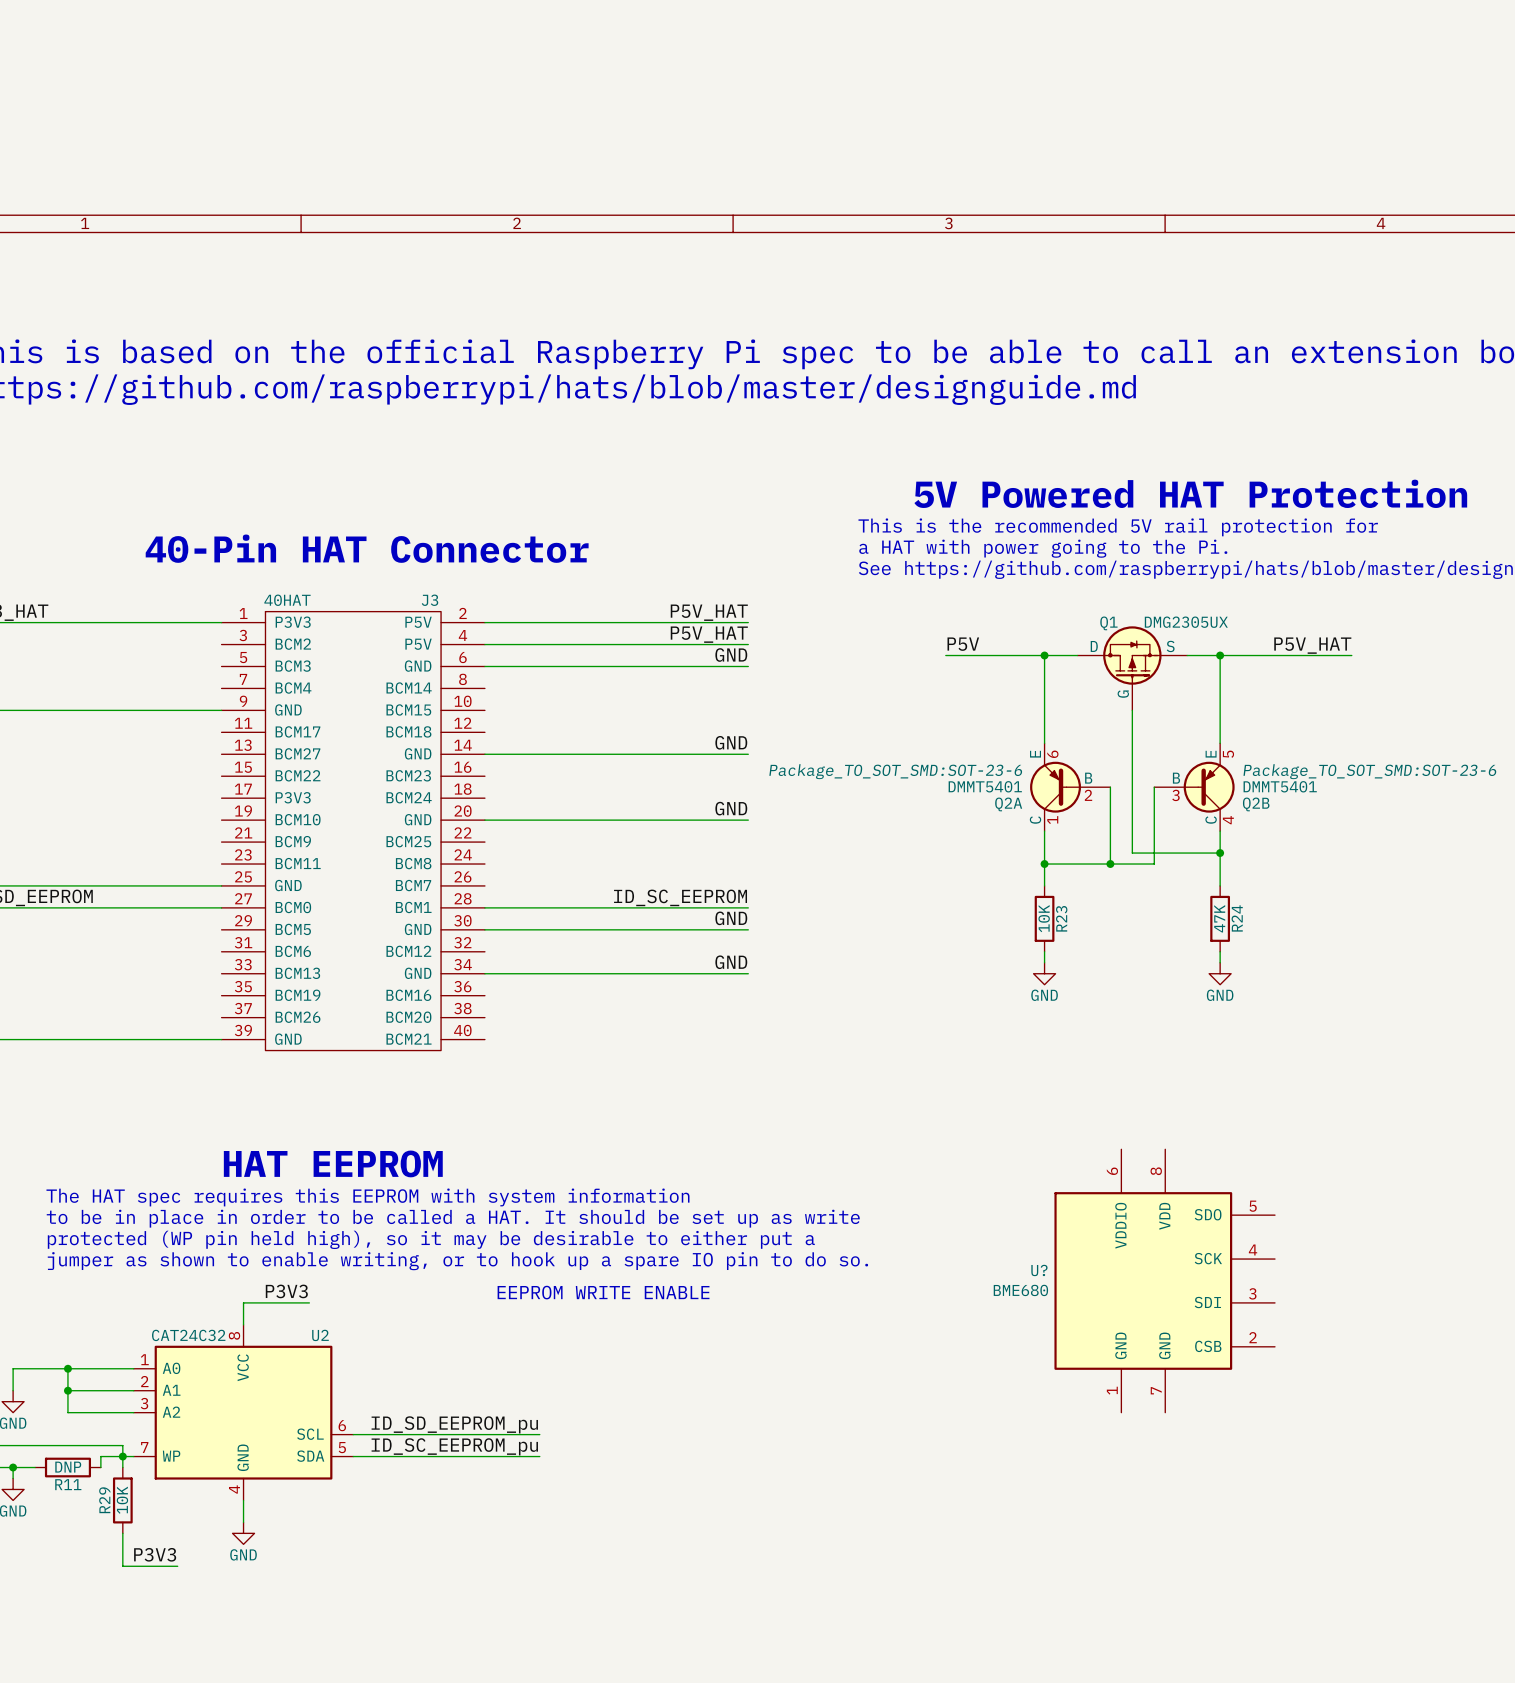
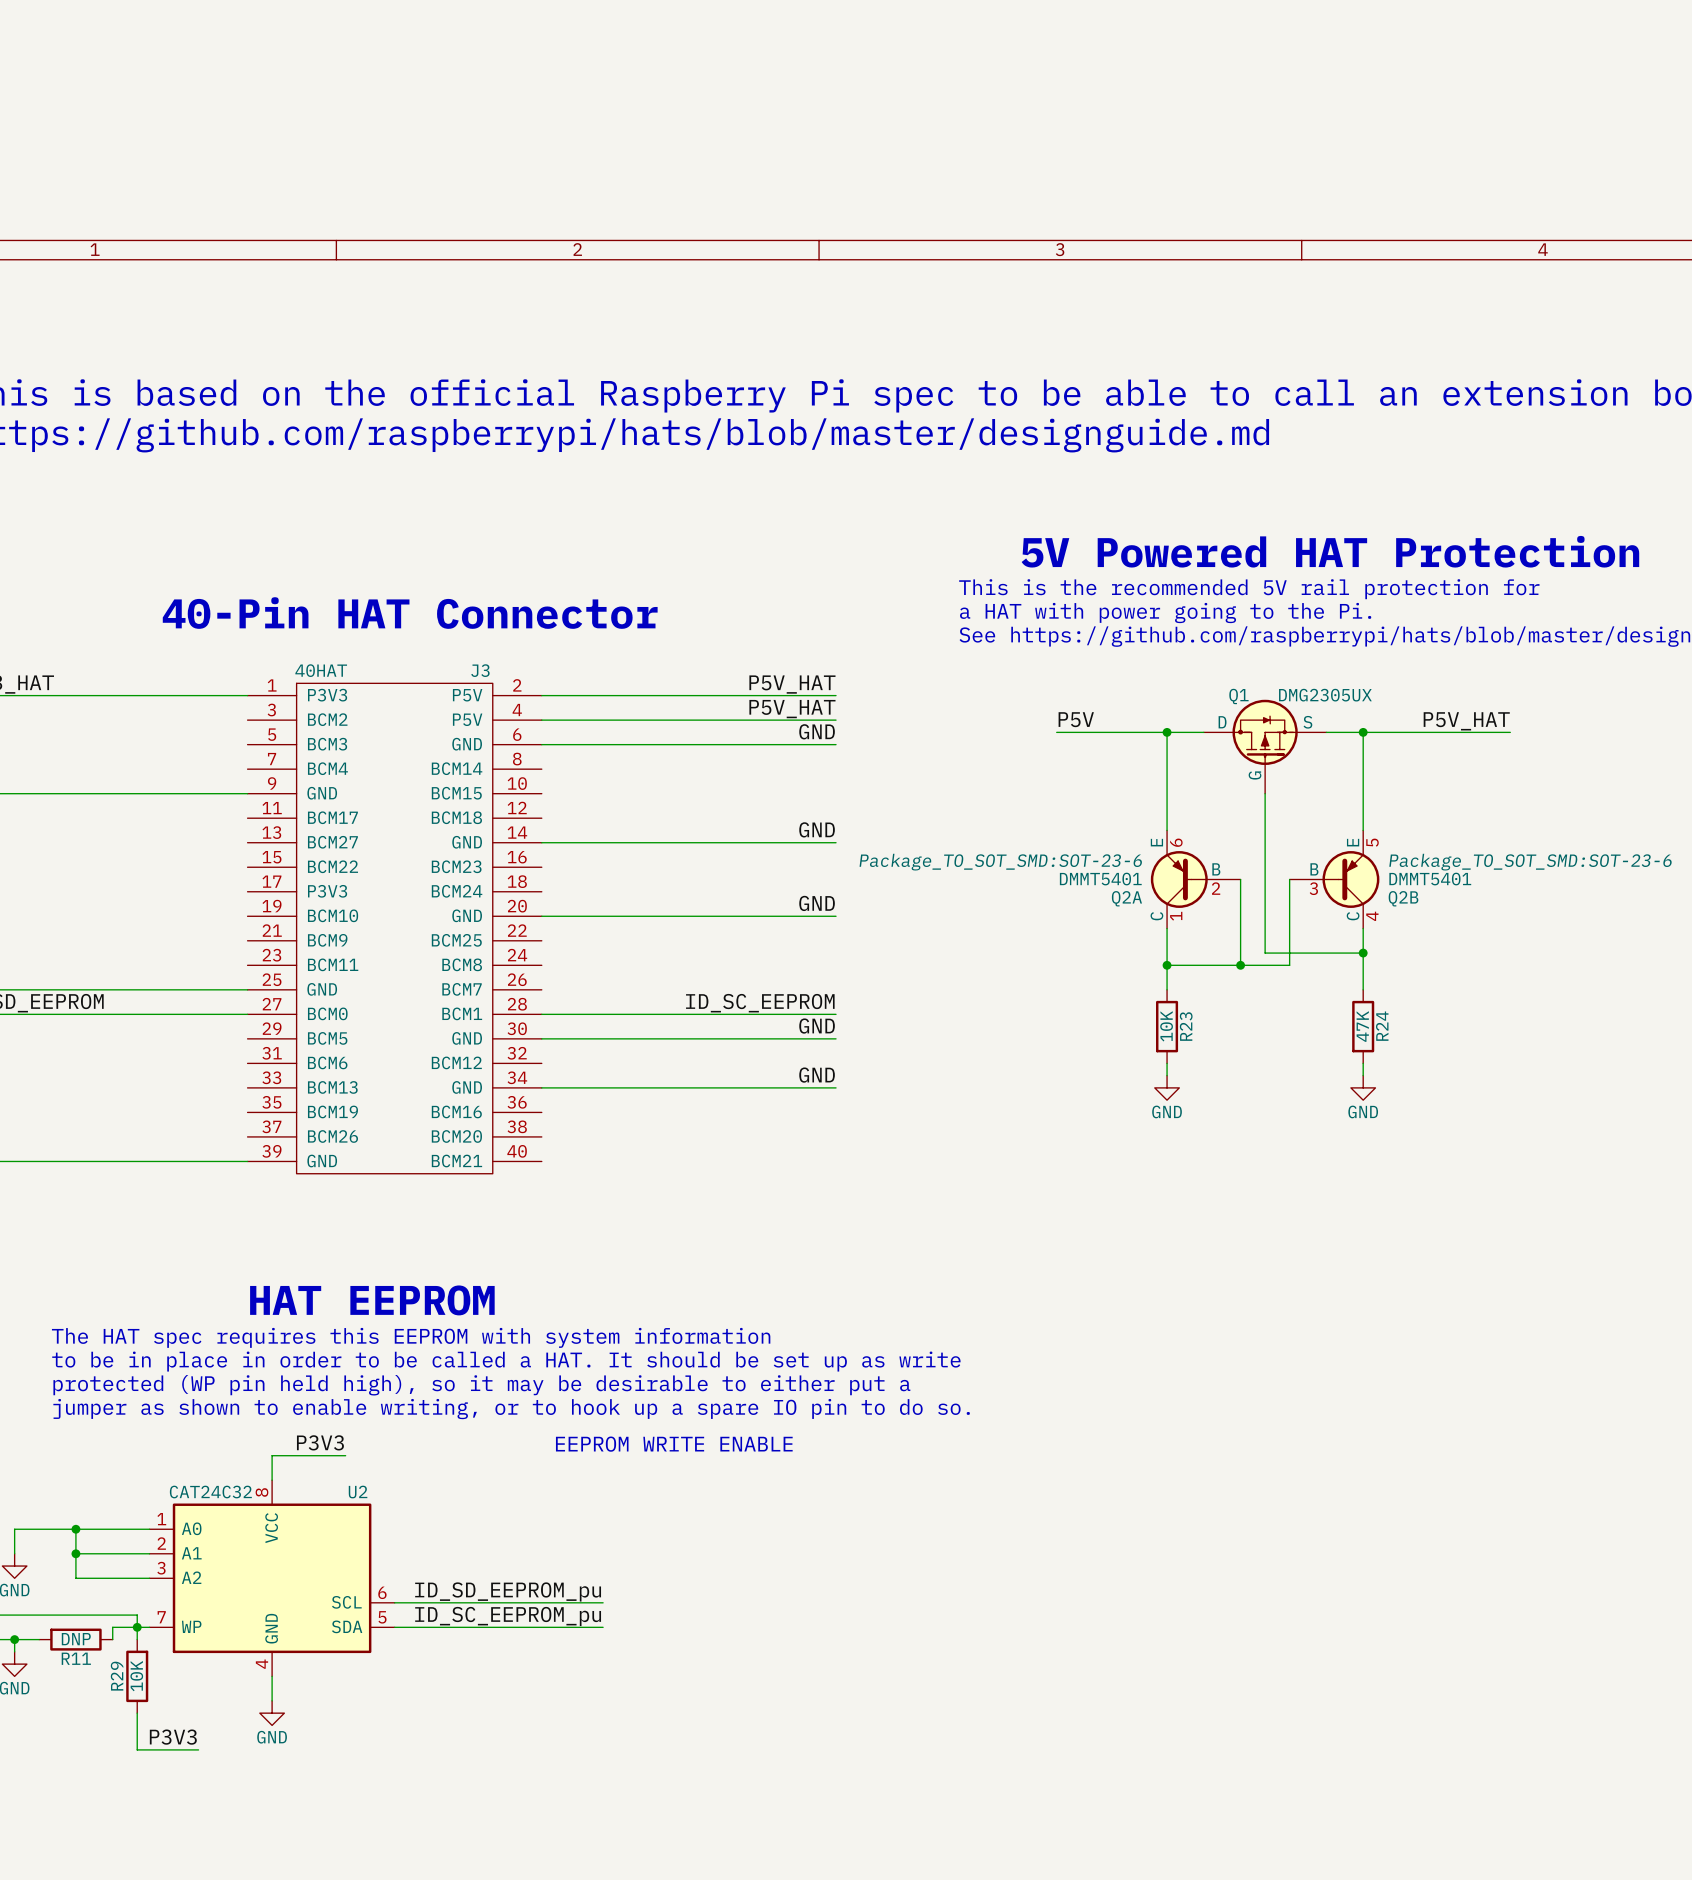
U?: BME680 (1164, 1280) -> none

